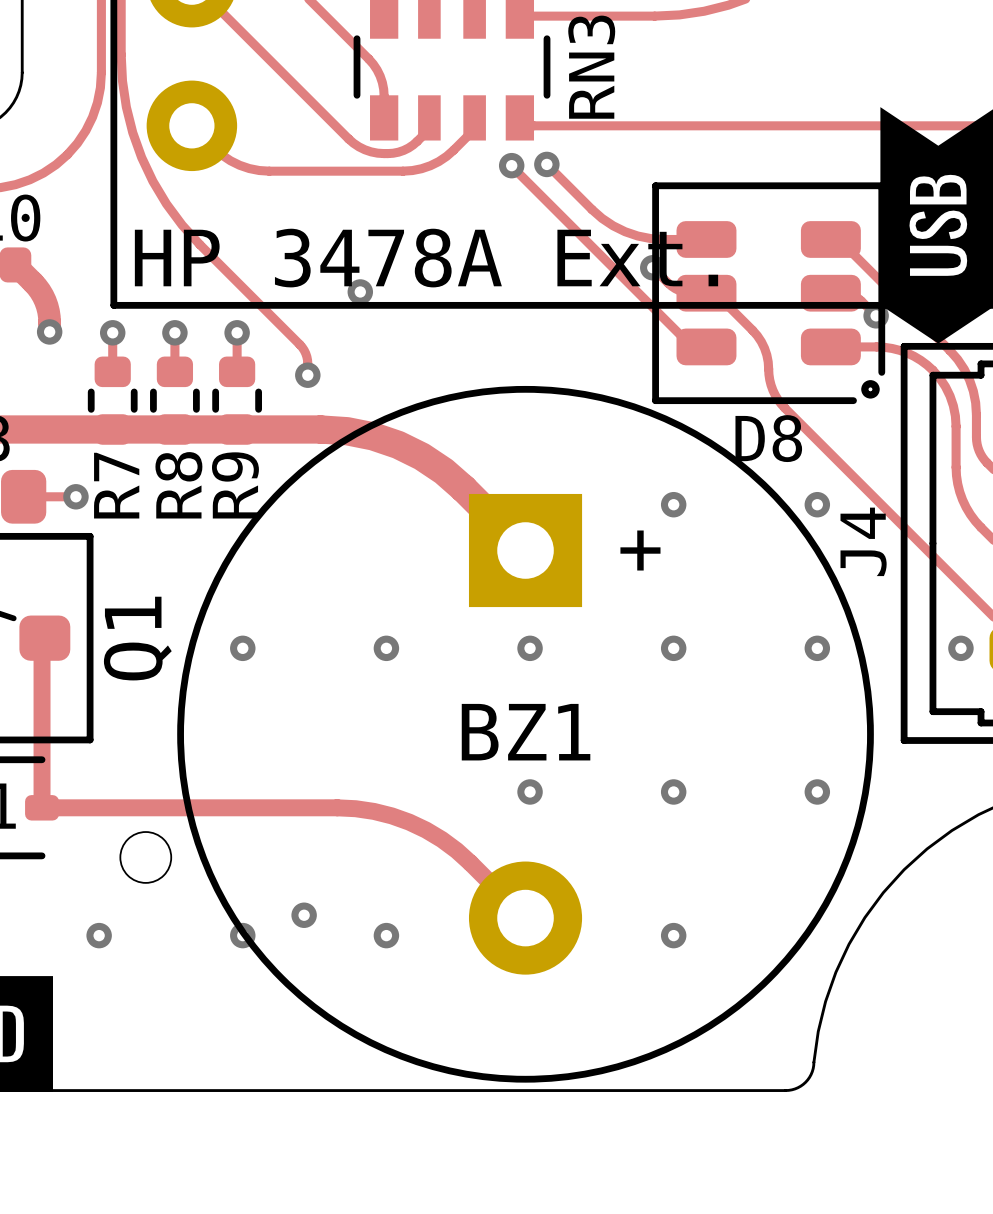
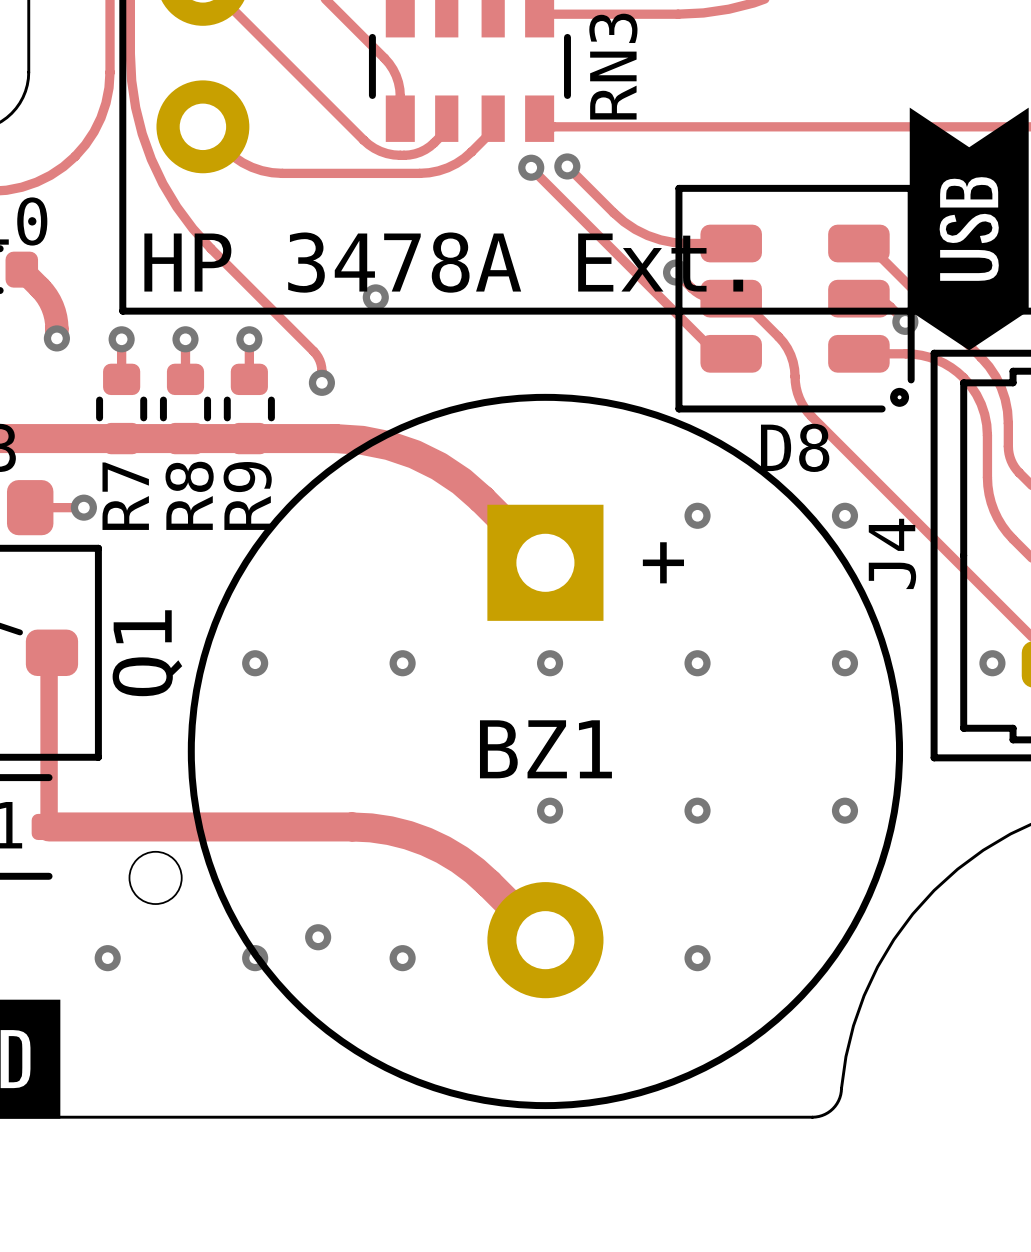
track width: thin (42, 807) (337, 807) (374, 811) (409, 822) (441, 839) (470, 862) (525, 918) -> thick (49, 826) (352, 826) (389, 830) (426, 841) (459, 859) (488, 883) (545, 940)

